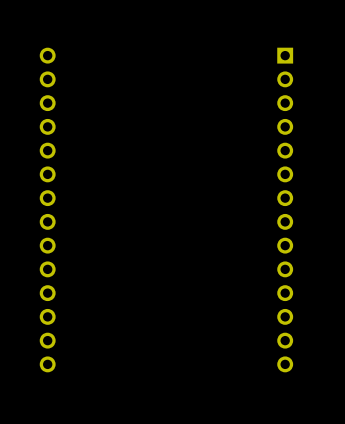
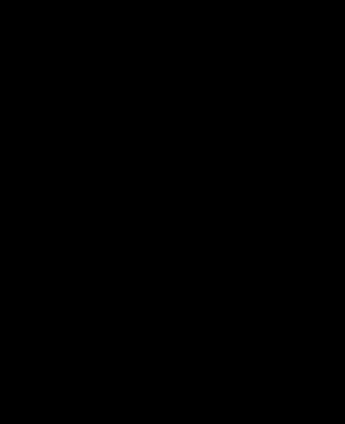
part: (47, 210) -> none
part: (285, 210) -> none

